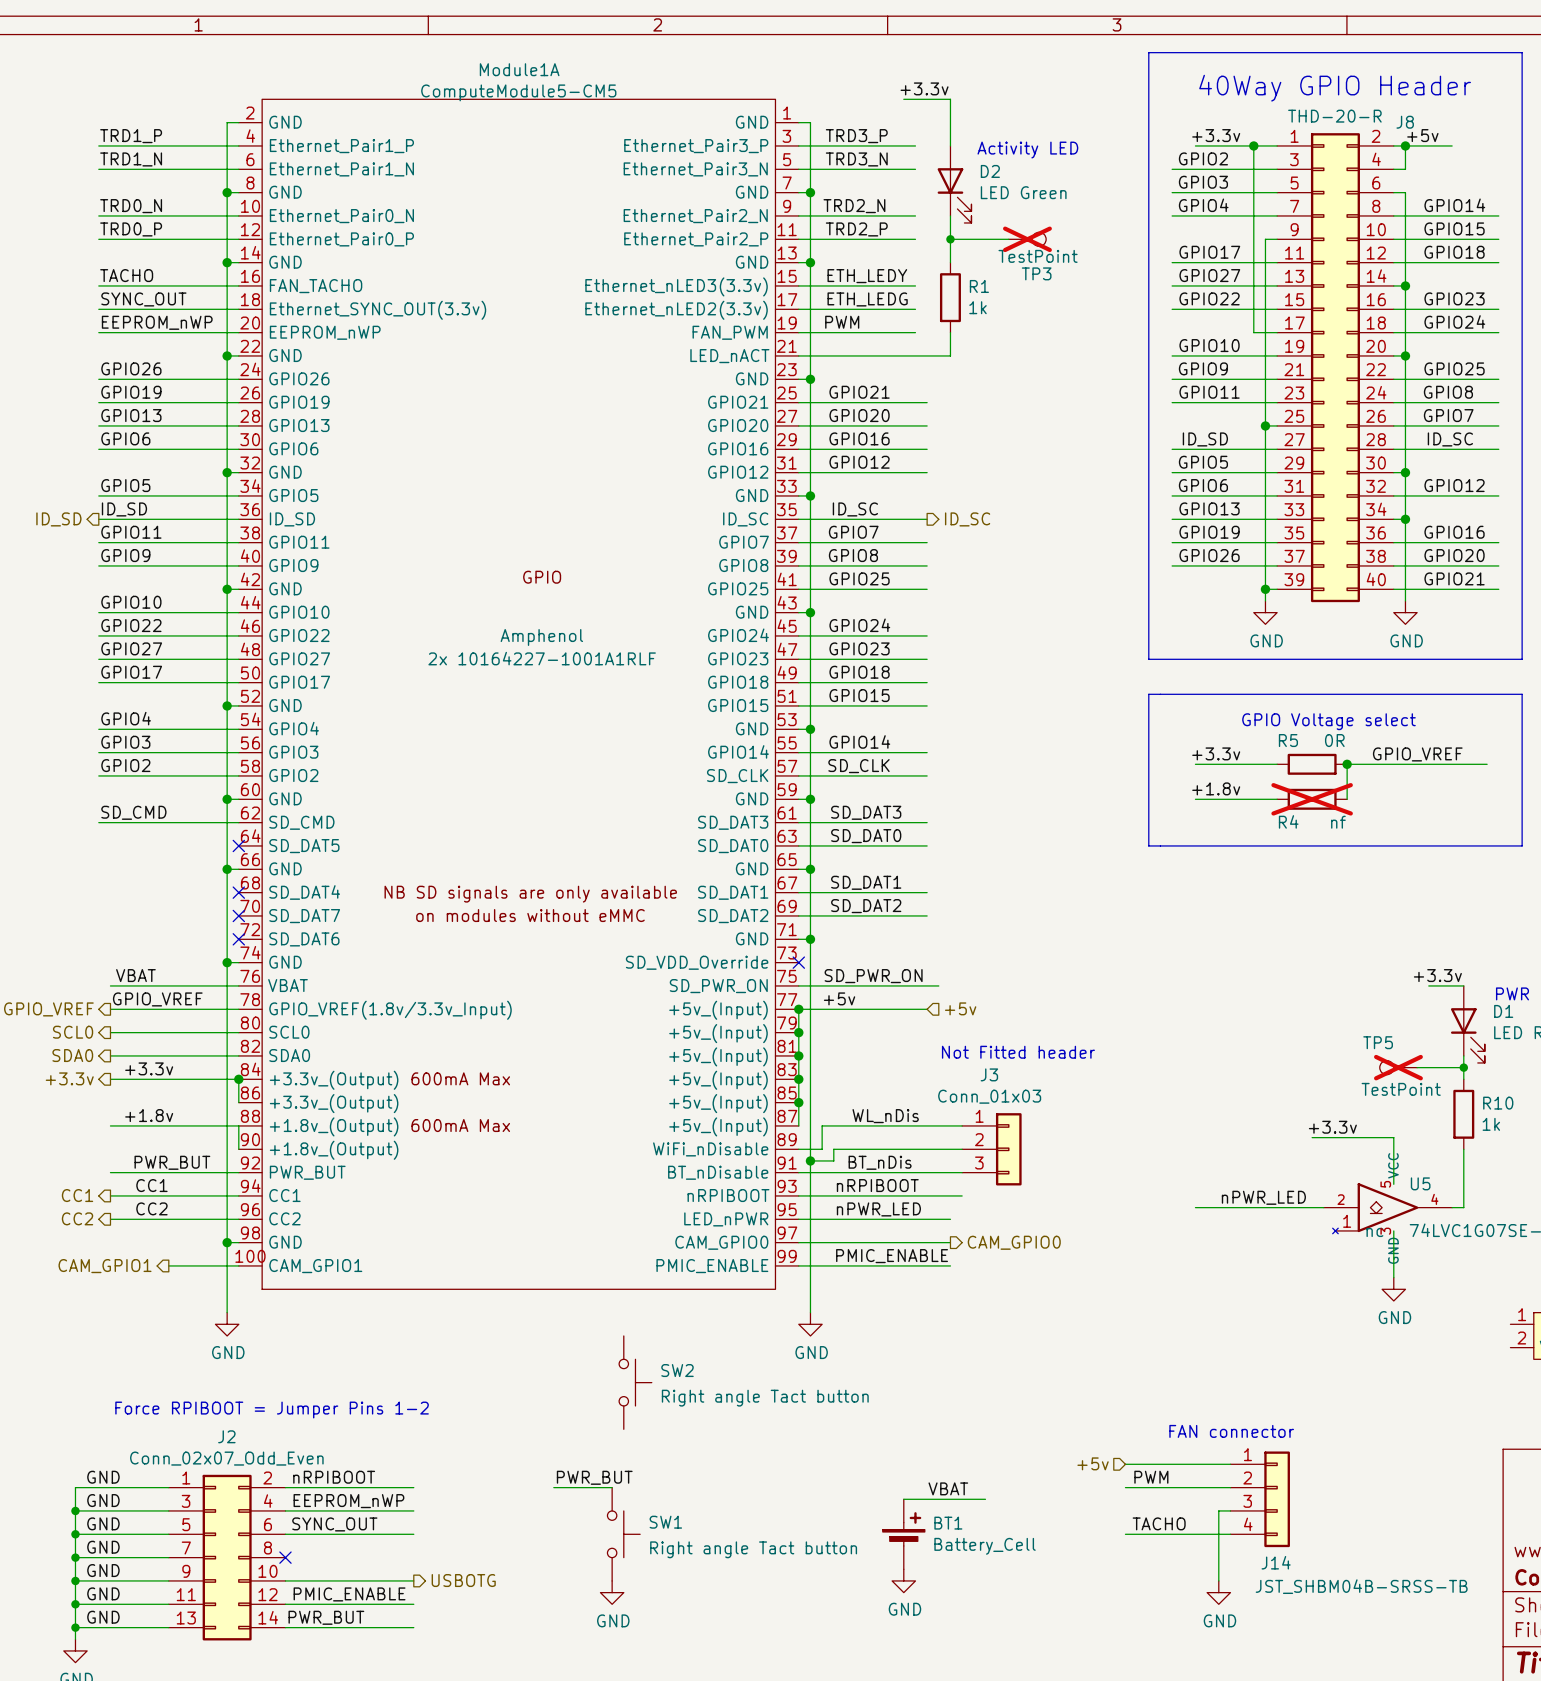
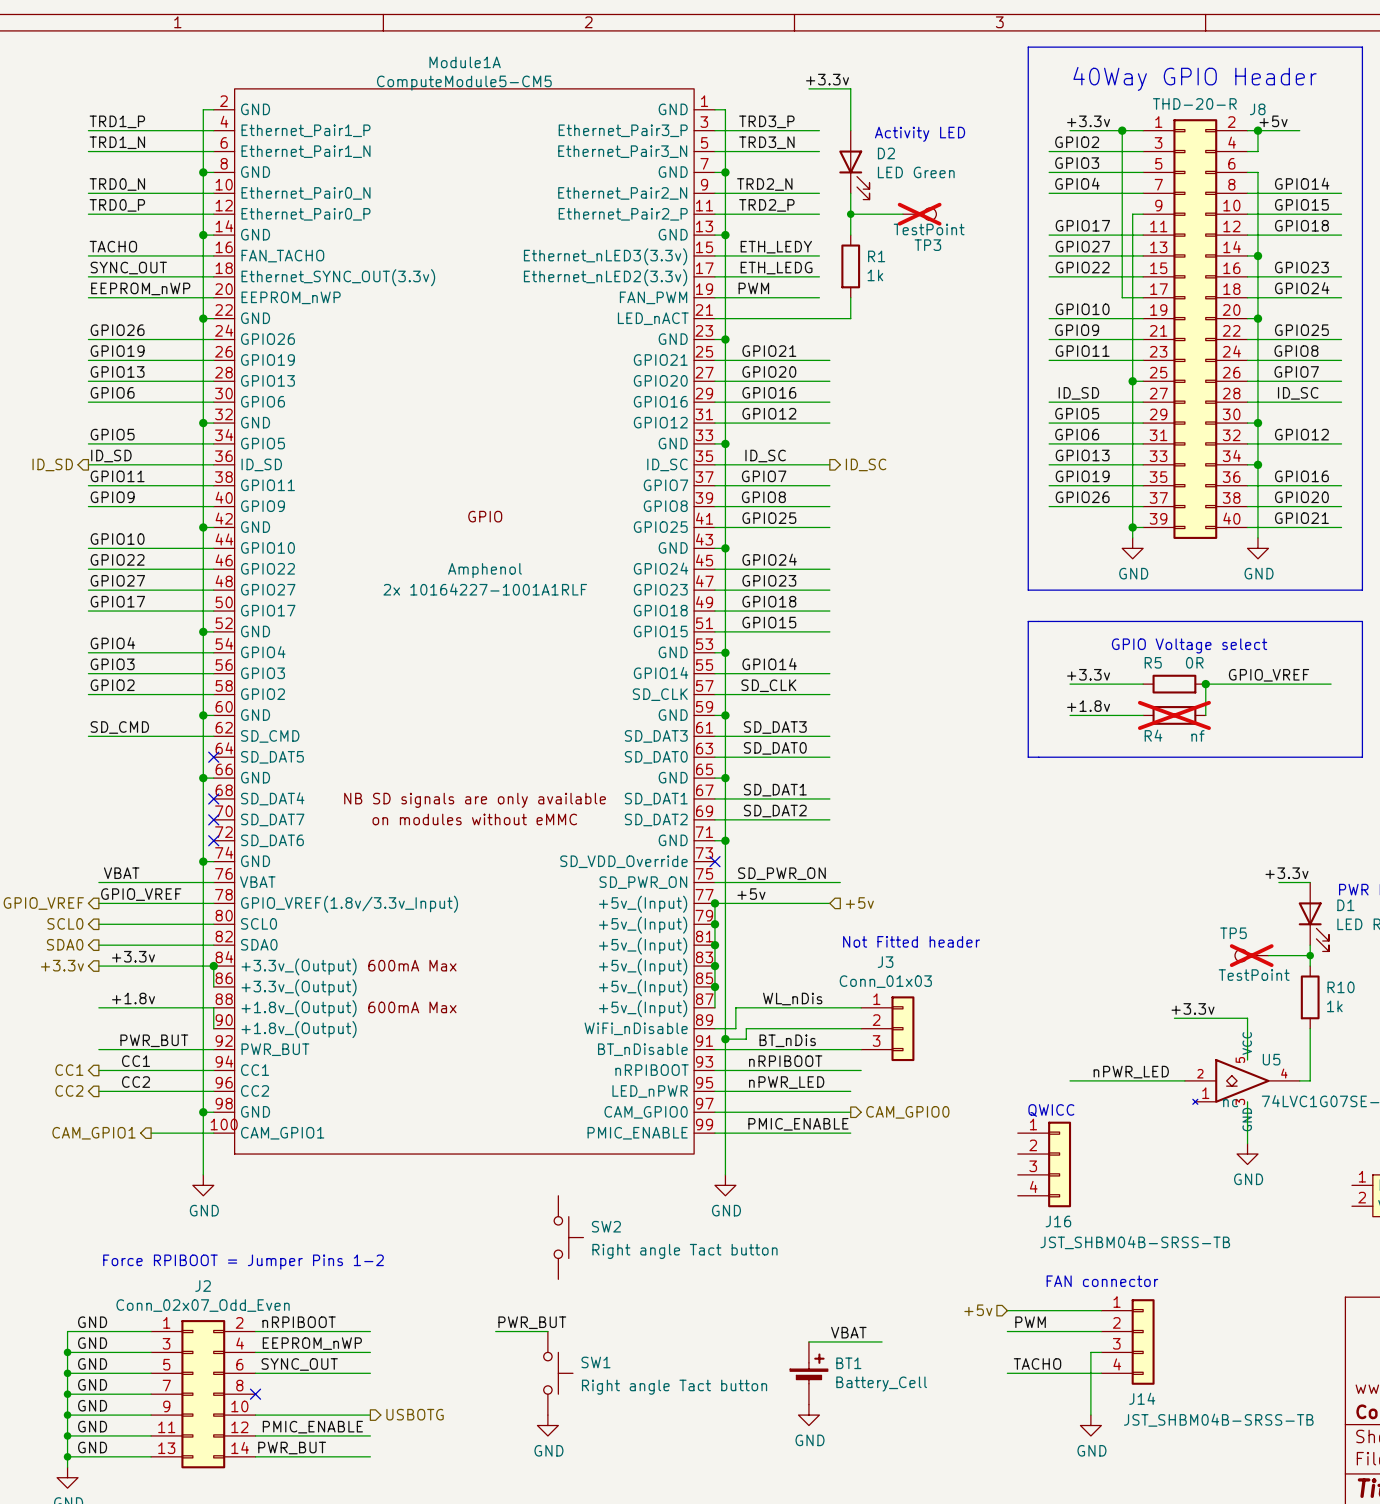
text: none -> QWICC (1051, 1110)
J16: none -> JST_SHBM04B-SRSS-TB (1044, 1164)

